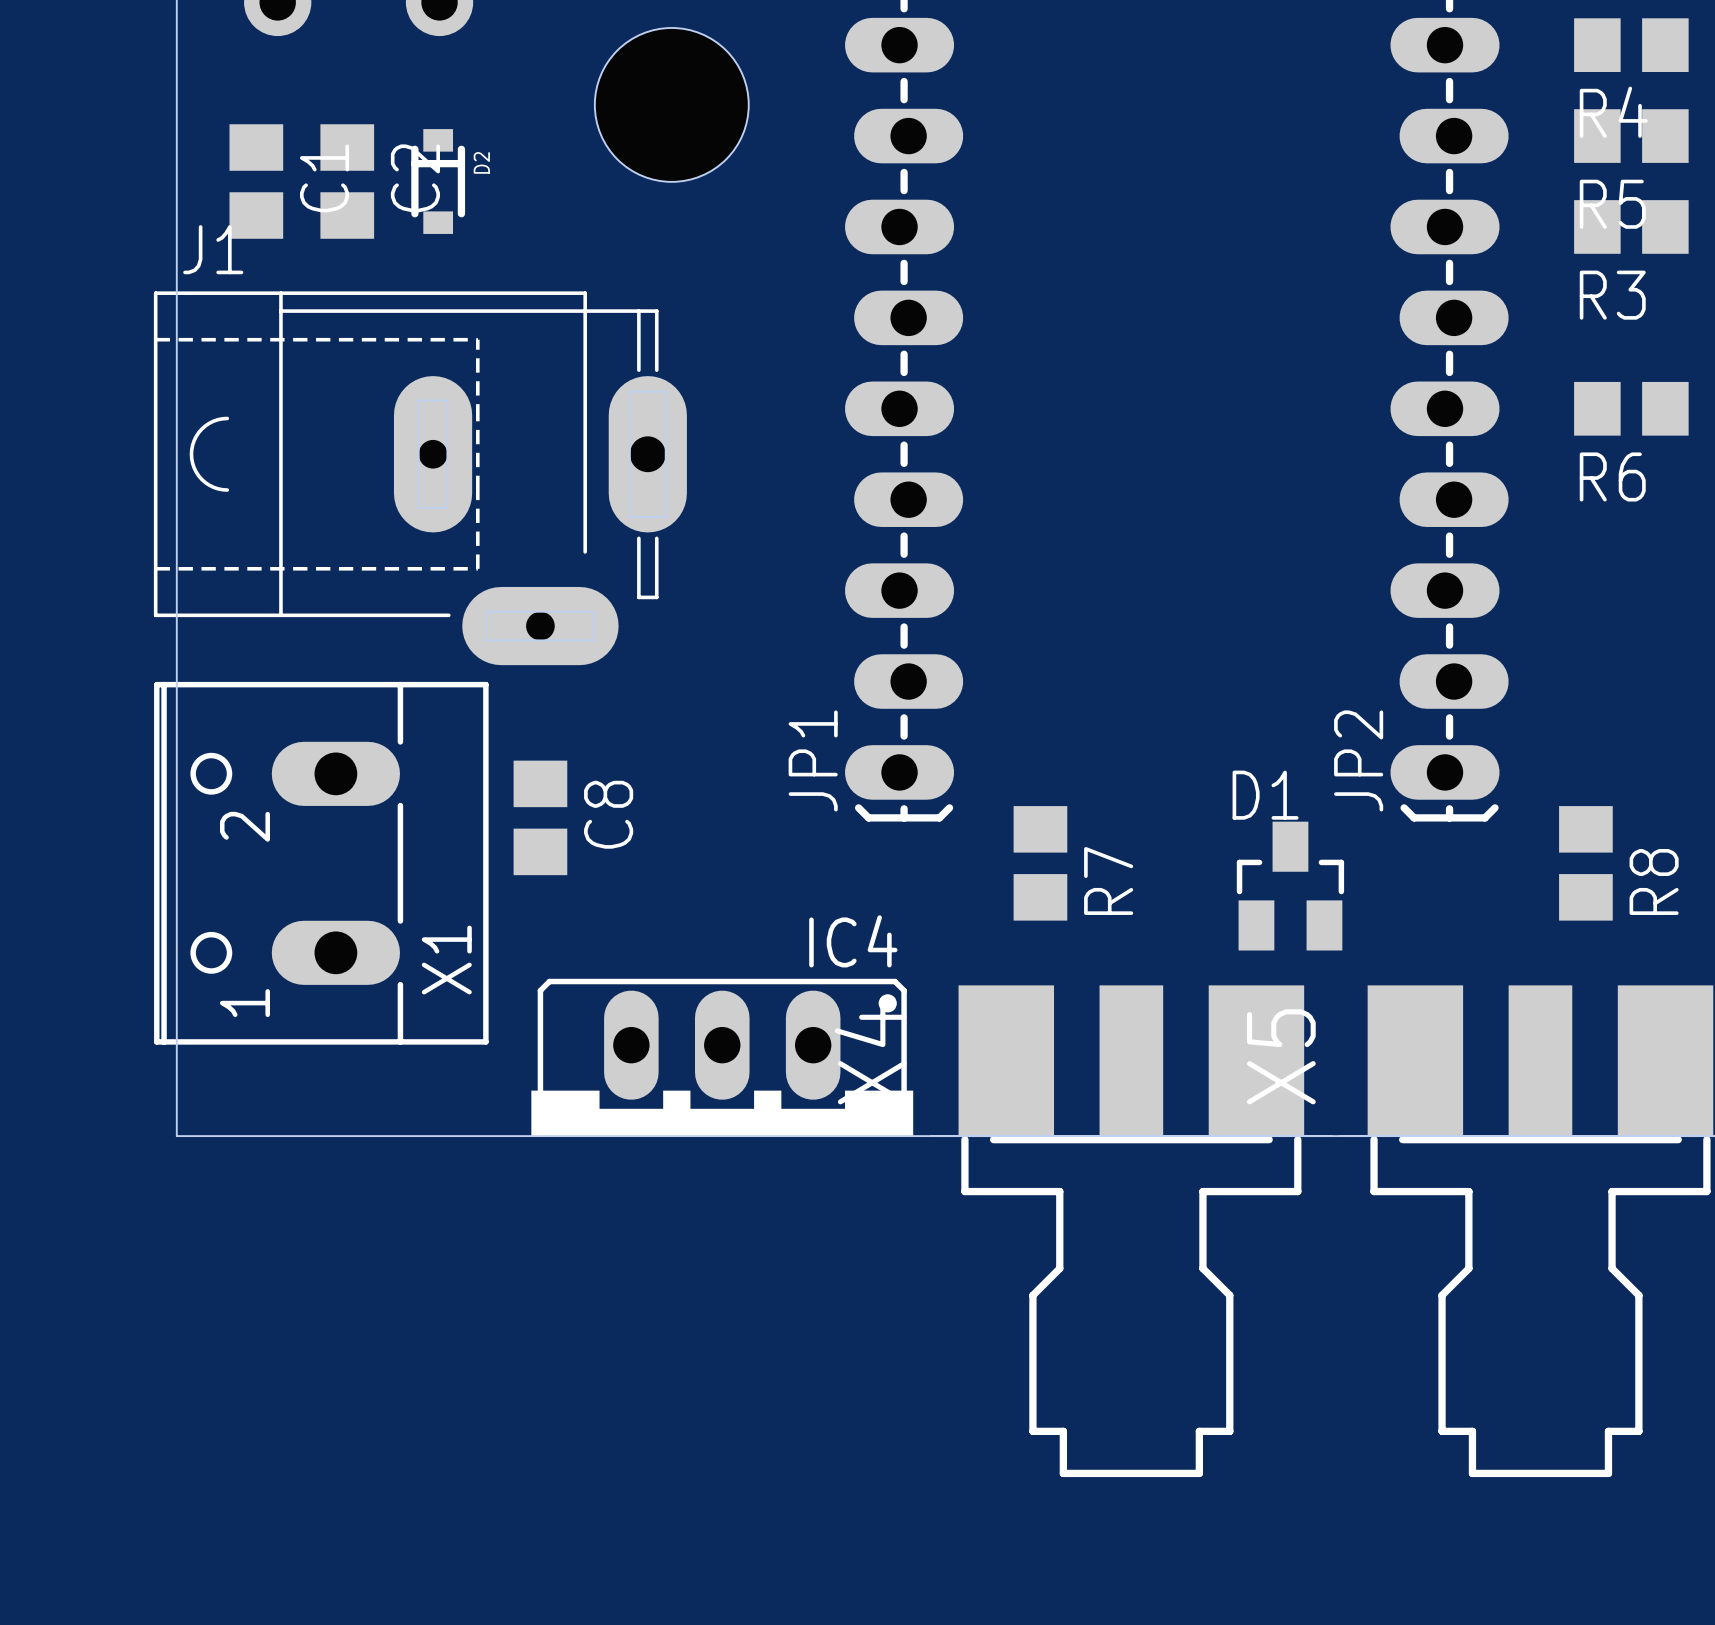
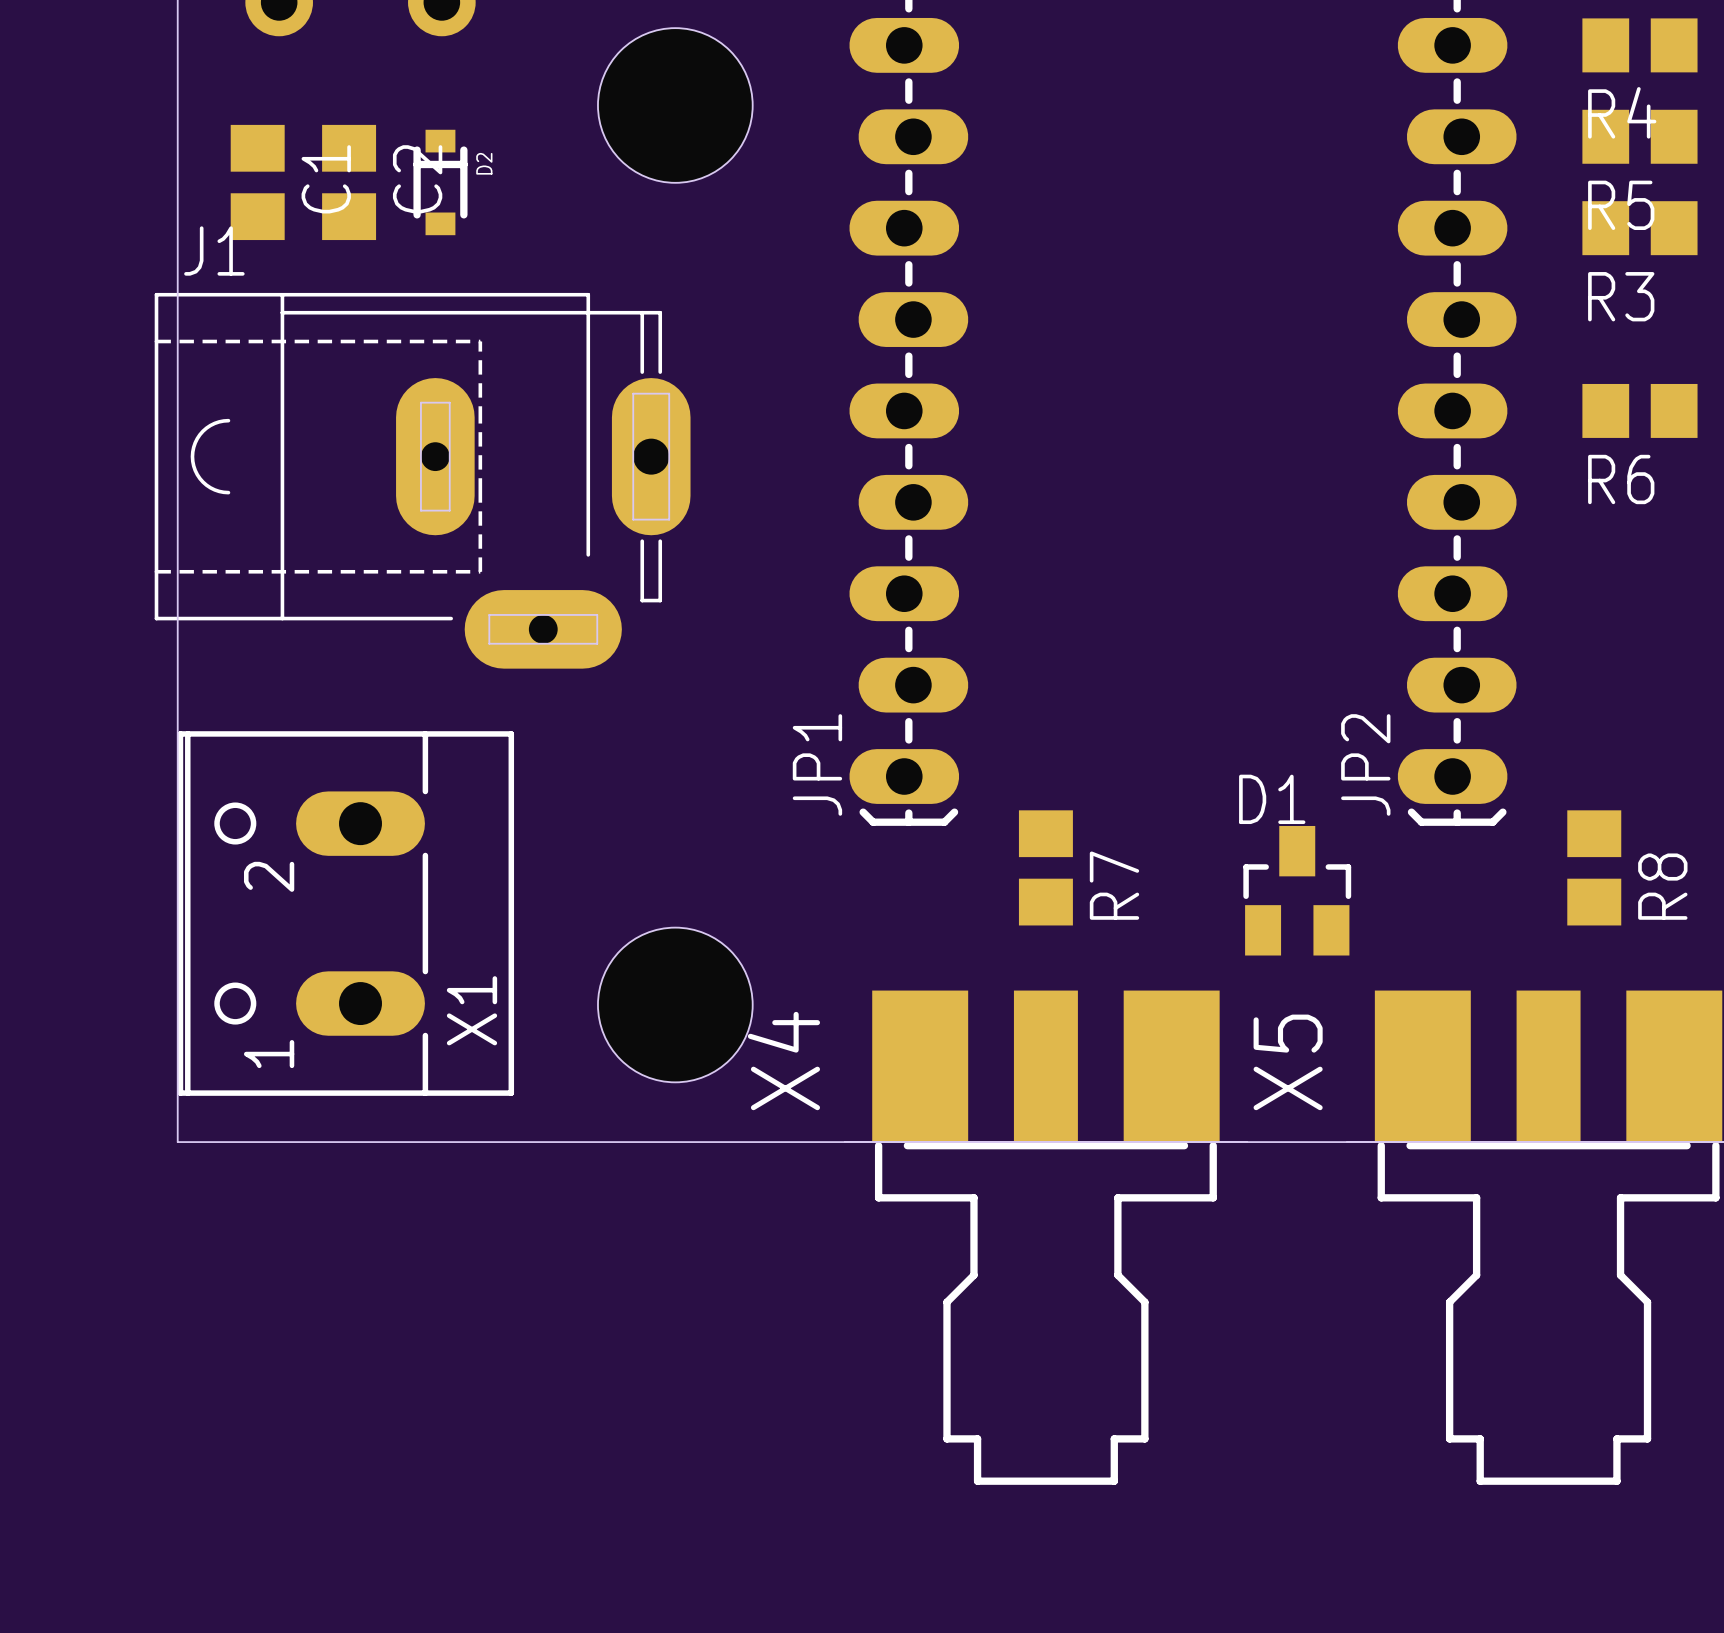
C8: (540, 817) -> none
X1 position: (321, 863) -> (345, 913)
hole: none -> (675, 1004)
IC4: (722, 1057) -> none
X4 position: (1131, 1231) -> (1045, 1237)

